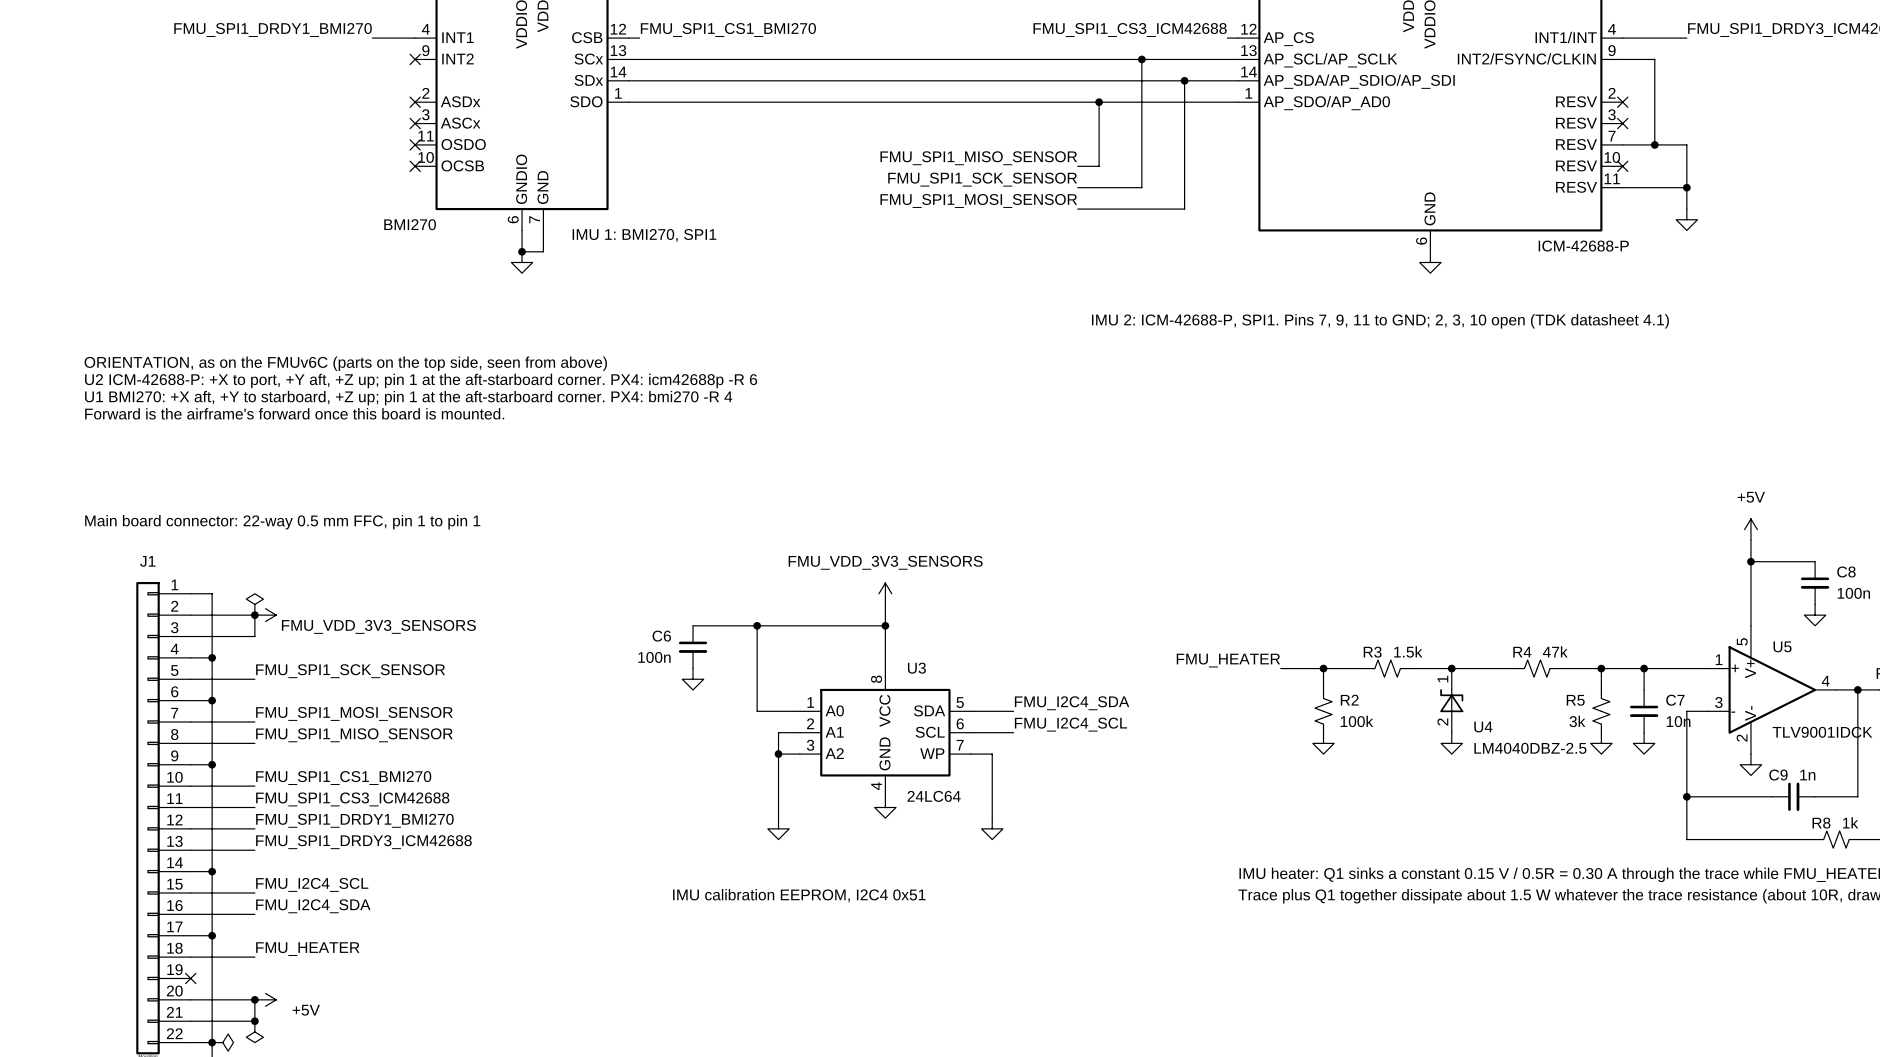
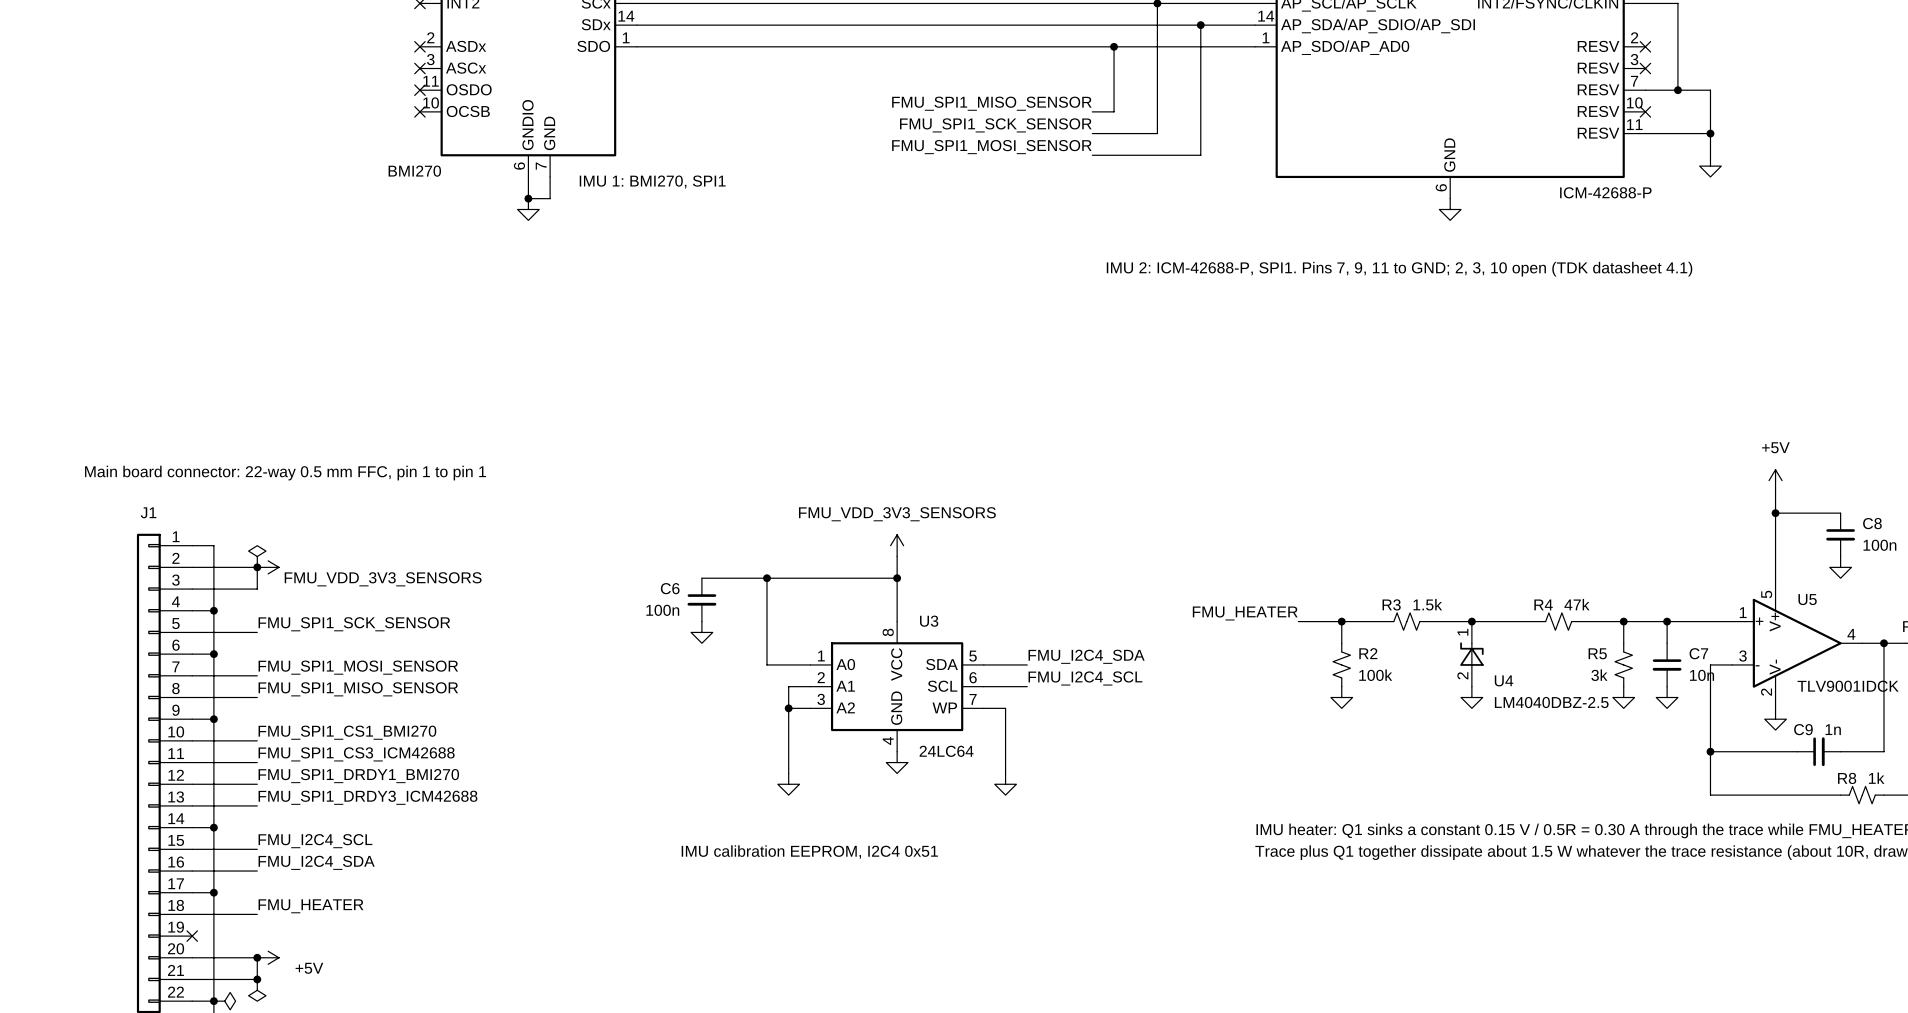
text: ORIENTATION, as on the FMUv6C (parts on the top side, seen from above) (345, 363) -> none
text: U2 ICM-42688-P: +X to port, +Y aft, +Z up; pin 1 at the aft-starboard corner. PX4: icm42688p -R 6 (421, 380) -> none
text: U1 BMI270: +X aft, +Y to starboard, +Z up; pin 1 at the aft-starboard corner. PX4: bmi270 -R 4 (408, 398) -> none
text: Forward is the airframe's forward once this board is mounted. (294, 413) -> none

